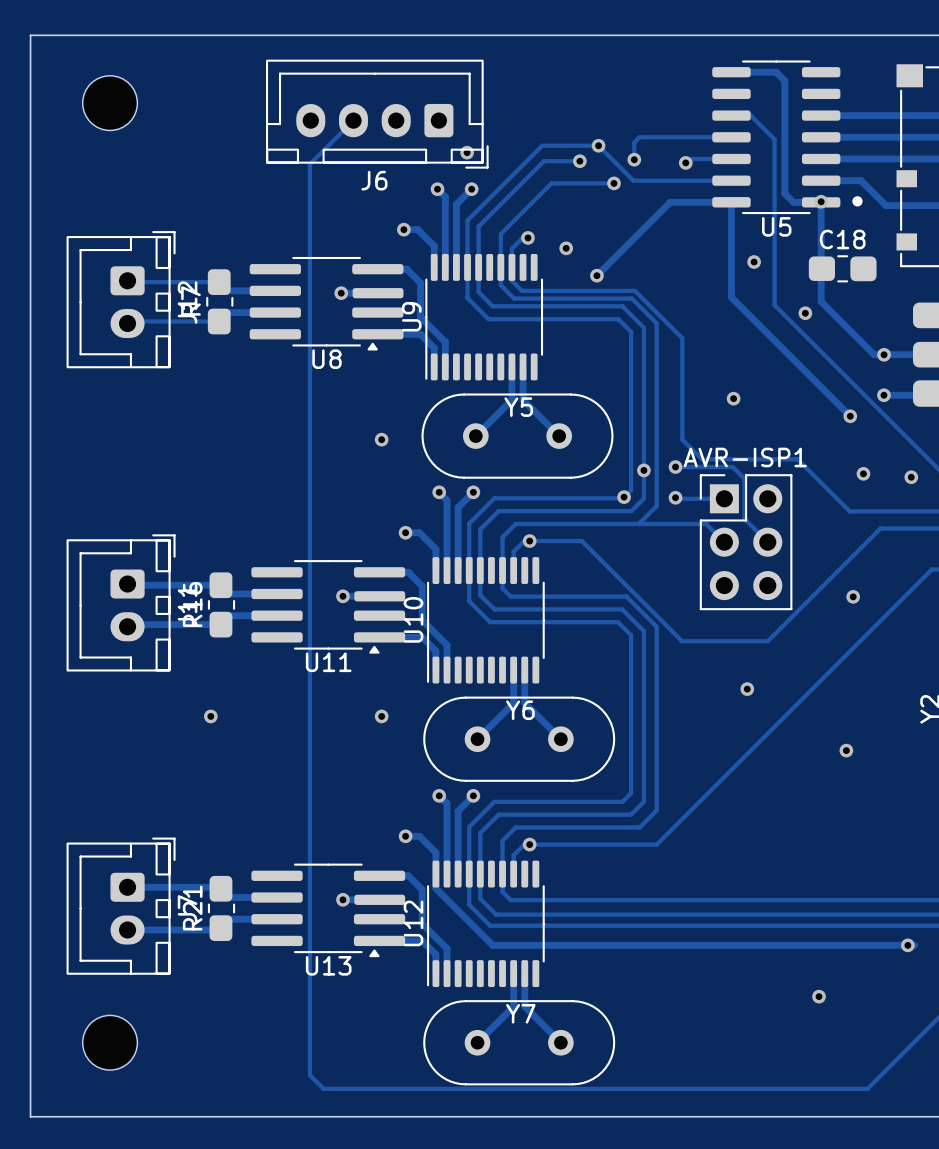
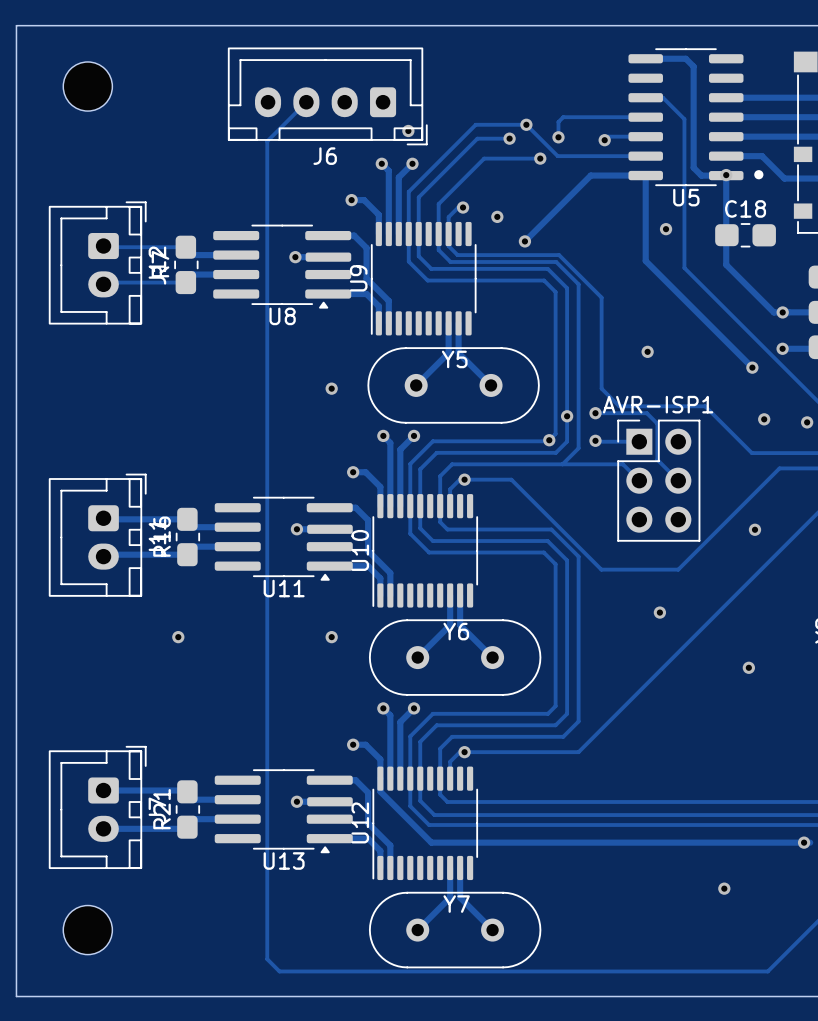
via: (805, 313) -> none

